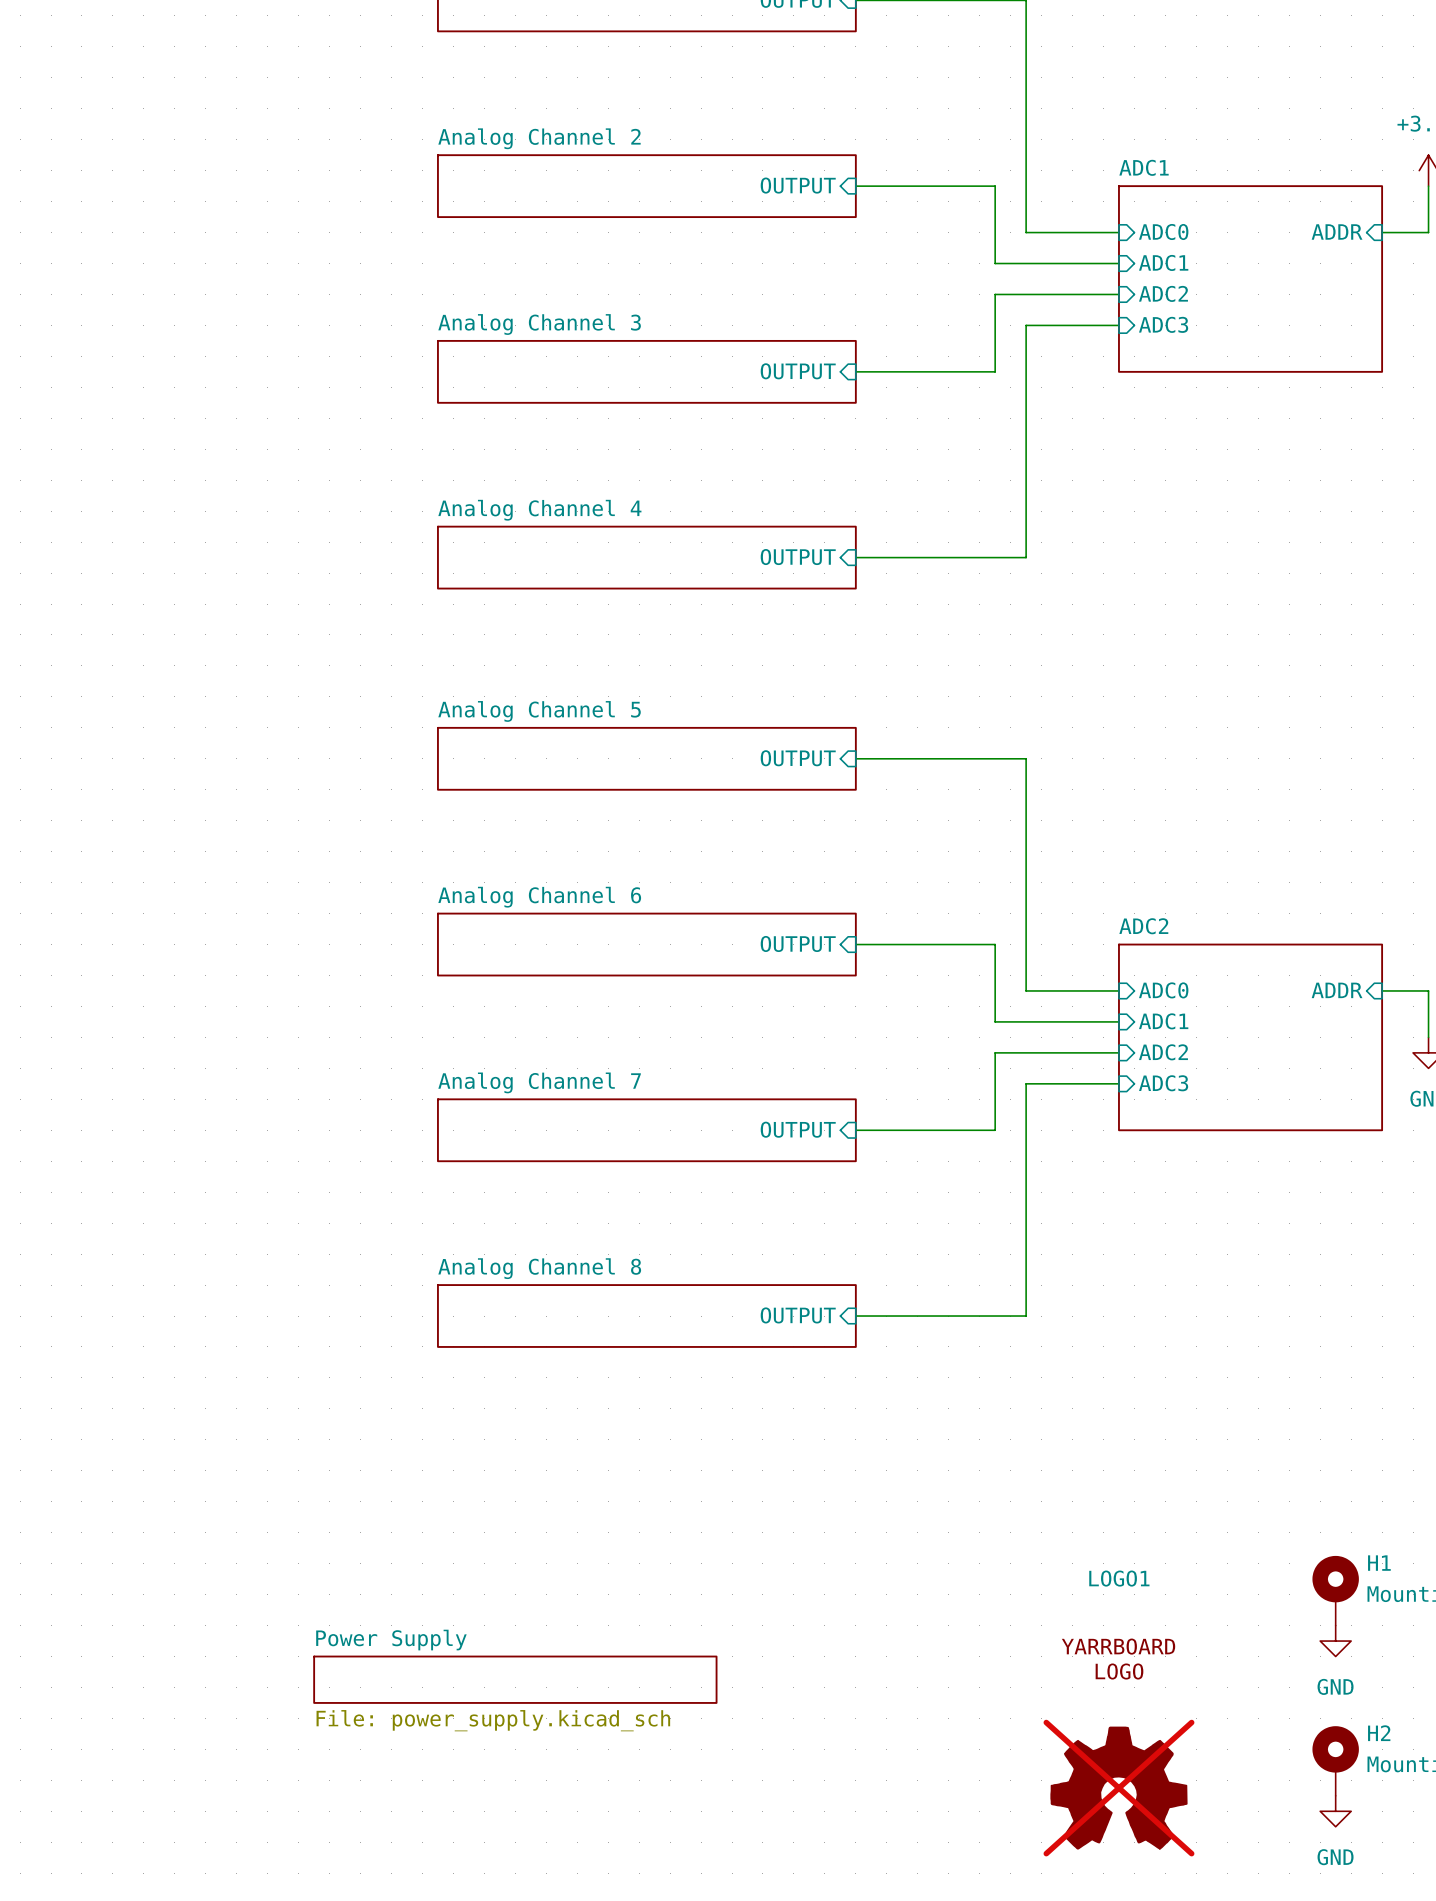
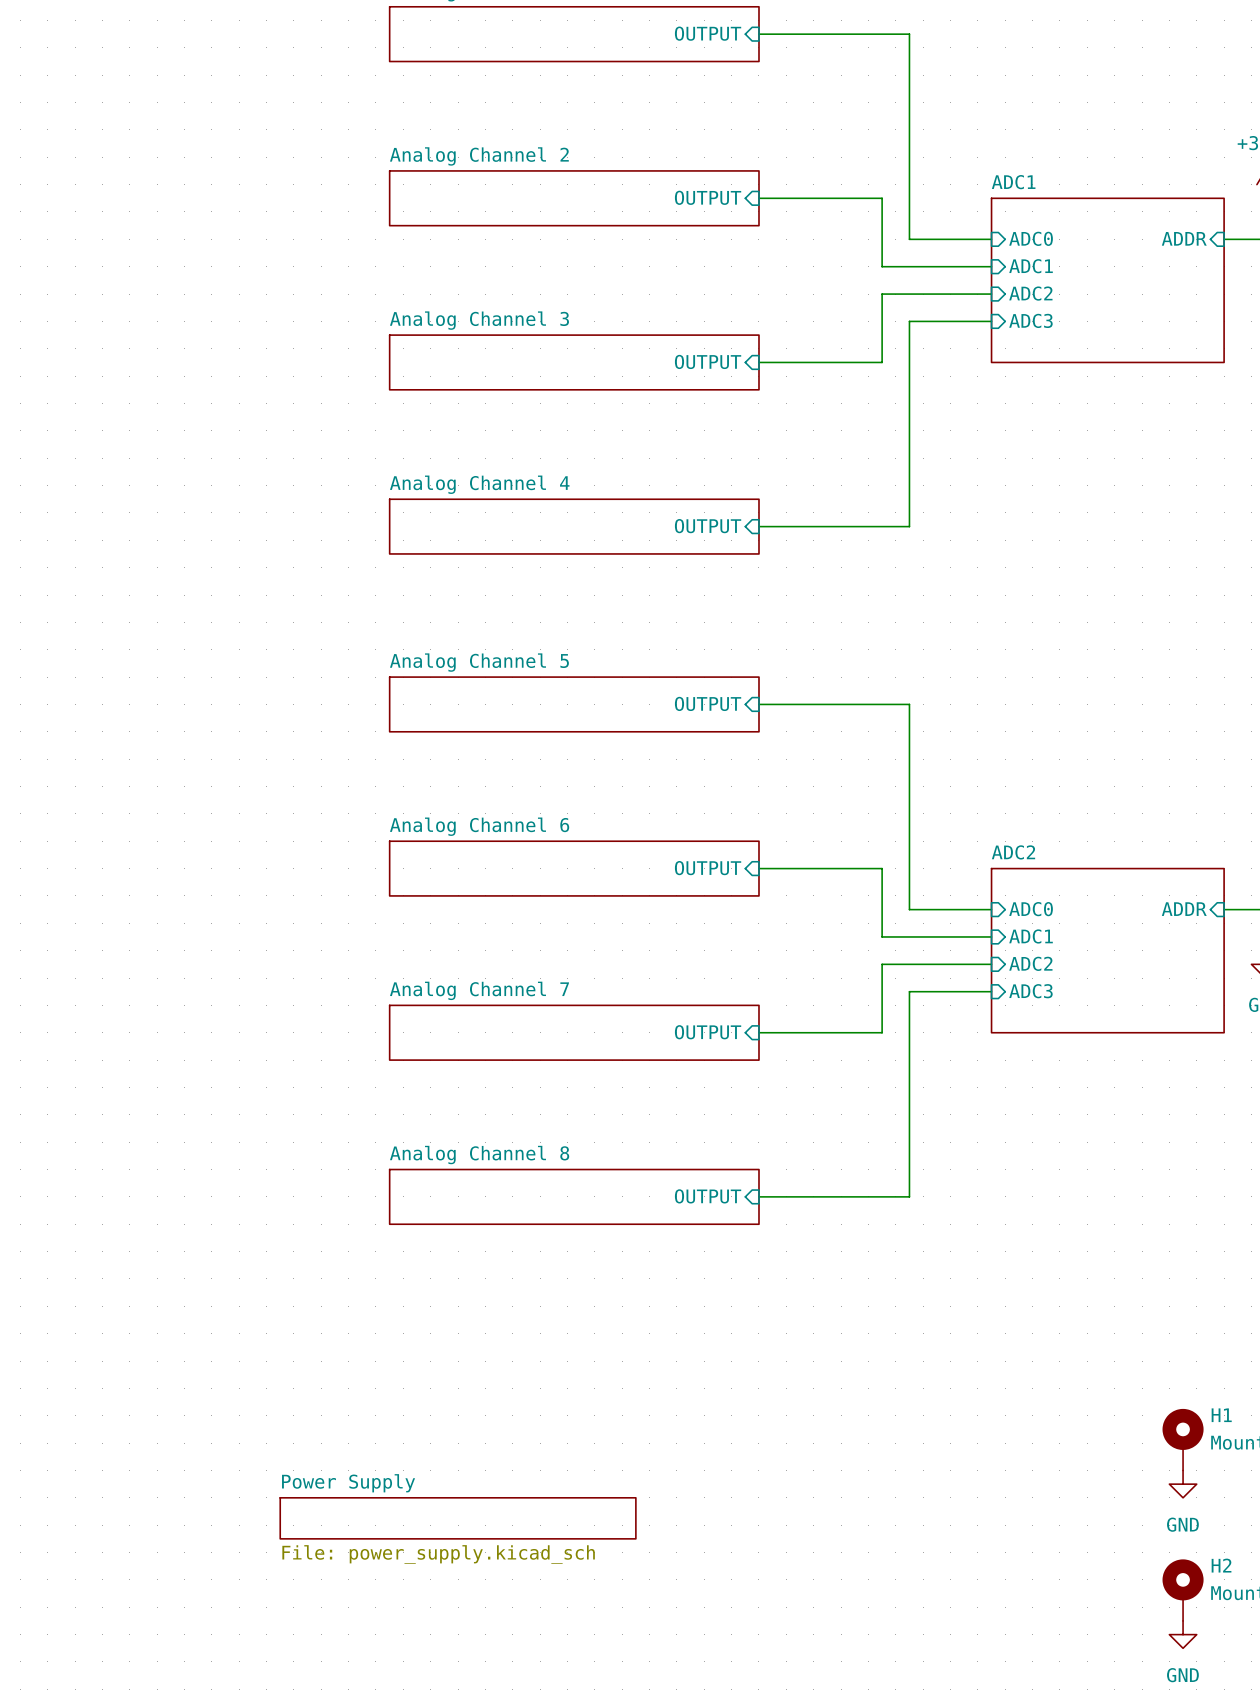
LOGO1: (1118, 1625) -> none
part: (1118, 1788) -> none

